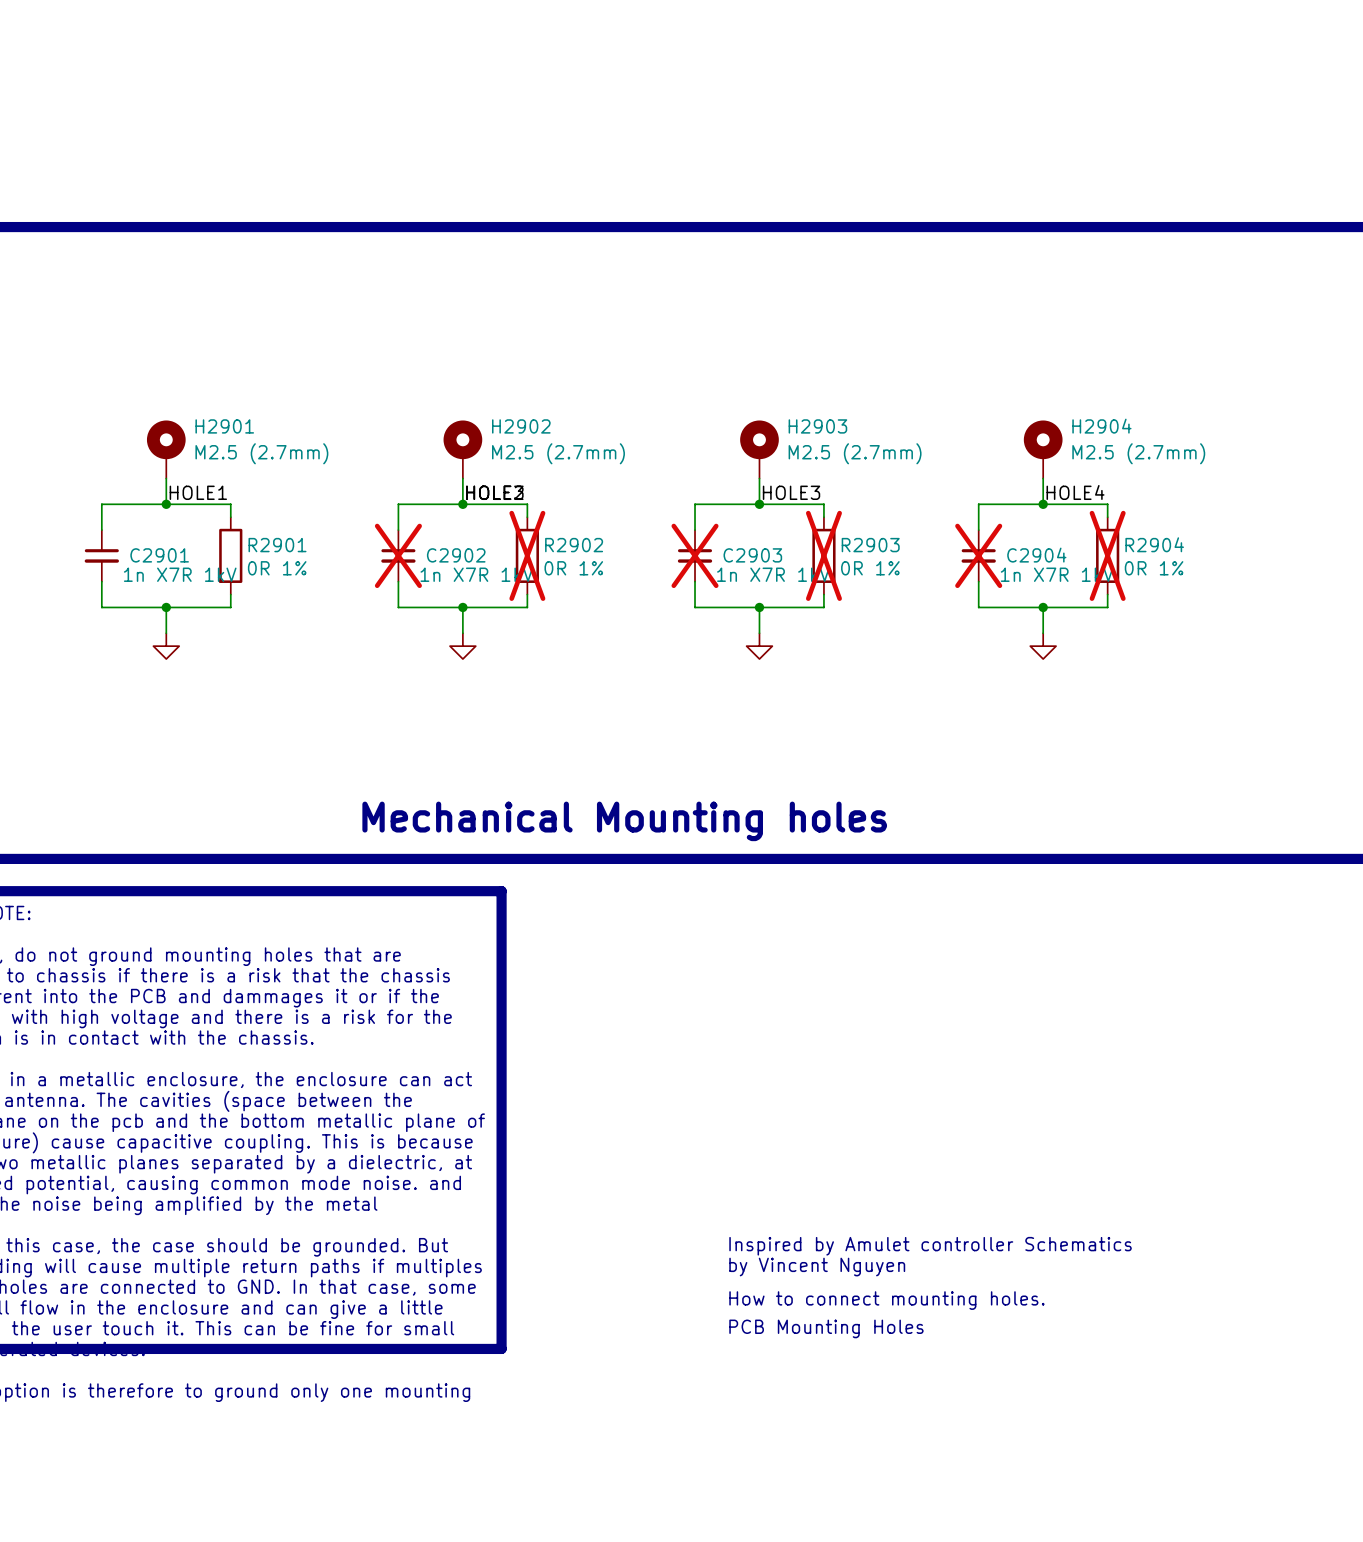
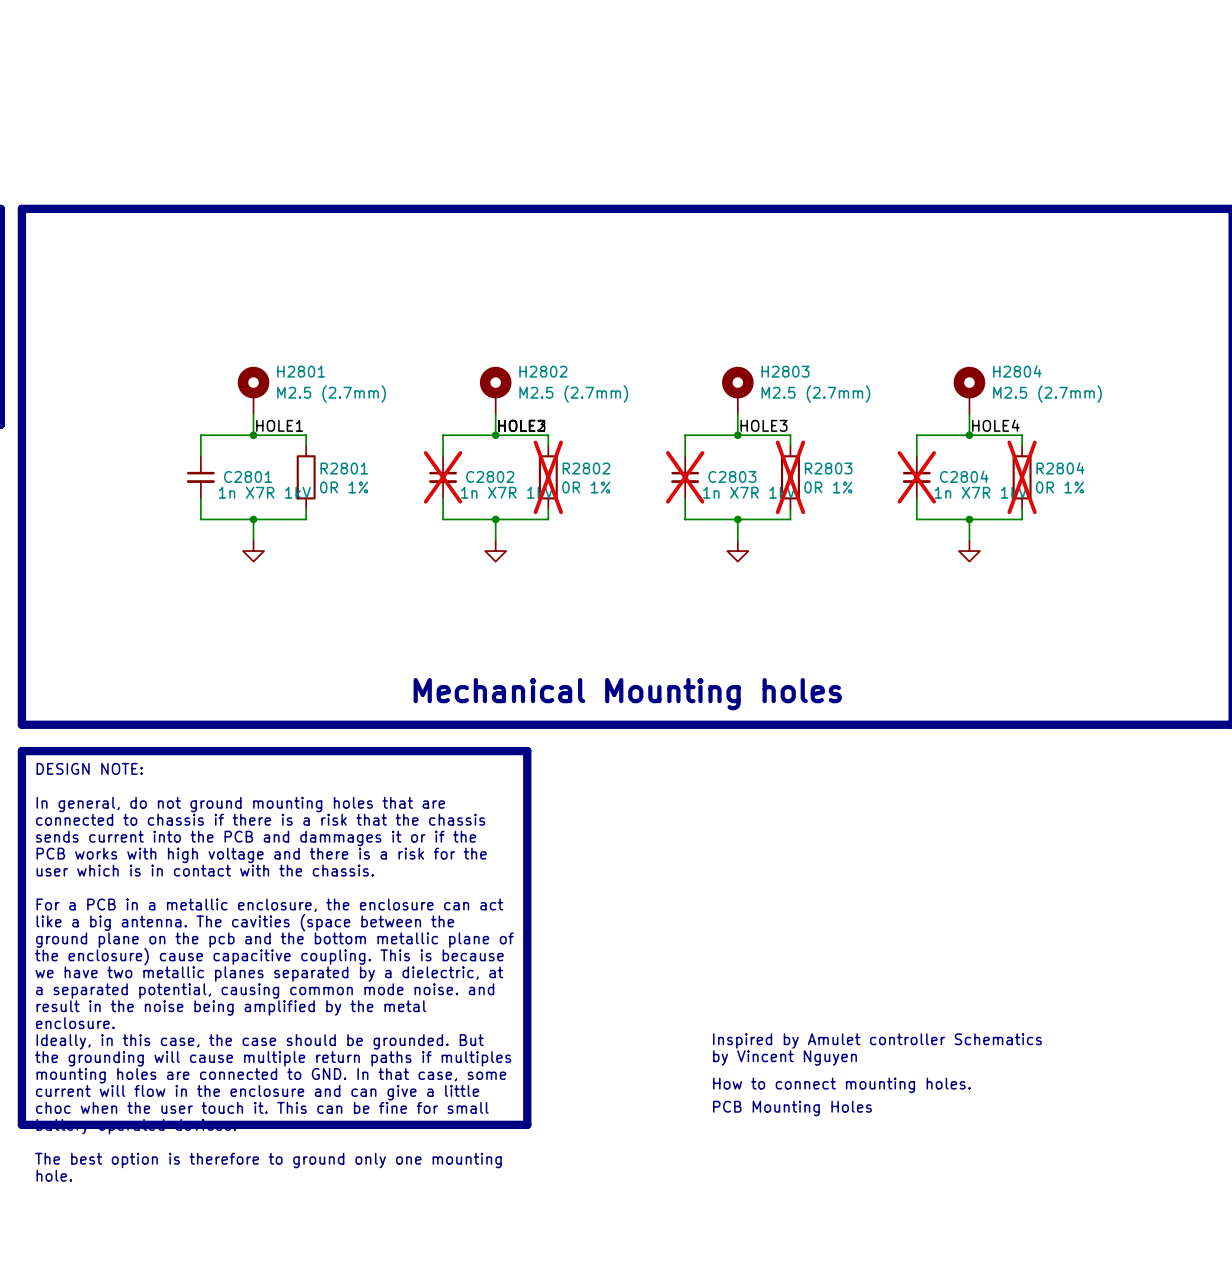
H2901 name: H2901 (224, 426) -> H2801 (301, 371)
H2902 name: H2902 (521, 426) -> H2802 (543, 371)
H2903 name: H2903 (817, 426) -> H2803 (785, 371)
H2904 name: H2904 (1101, 426) -> H2804 (1017, 371)
R2904 name: R2904 (1154, 544) -> R2804 (1060, 468)
R2901 name: R2901 (277, 545) -> R2801 (344, 468)
R2902 name: R2902 (574, 545) -> R2802 (586, 468)
R2903 name: R2903 (870, 545) -> R2803 (828, 468)
C2901 name: C2901 (159, 555) -> C2801 (248, 476)
C2902 name: C2902 (456, 555) -> C2802 (490, 476)
C2903 name: C2903 (752, 555) -> C2803 (732, 476)
C2904 name: C2904 (1036, 555) -> C2804 (964, 476)

